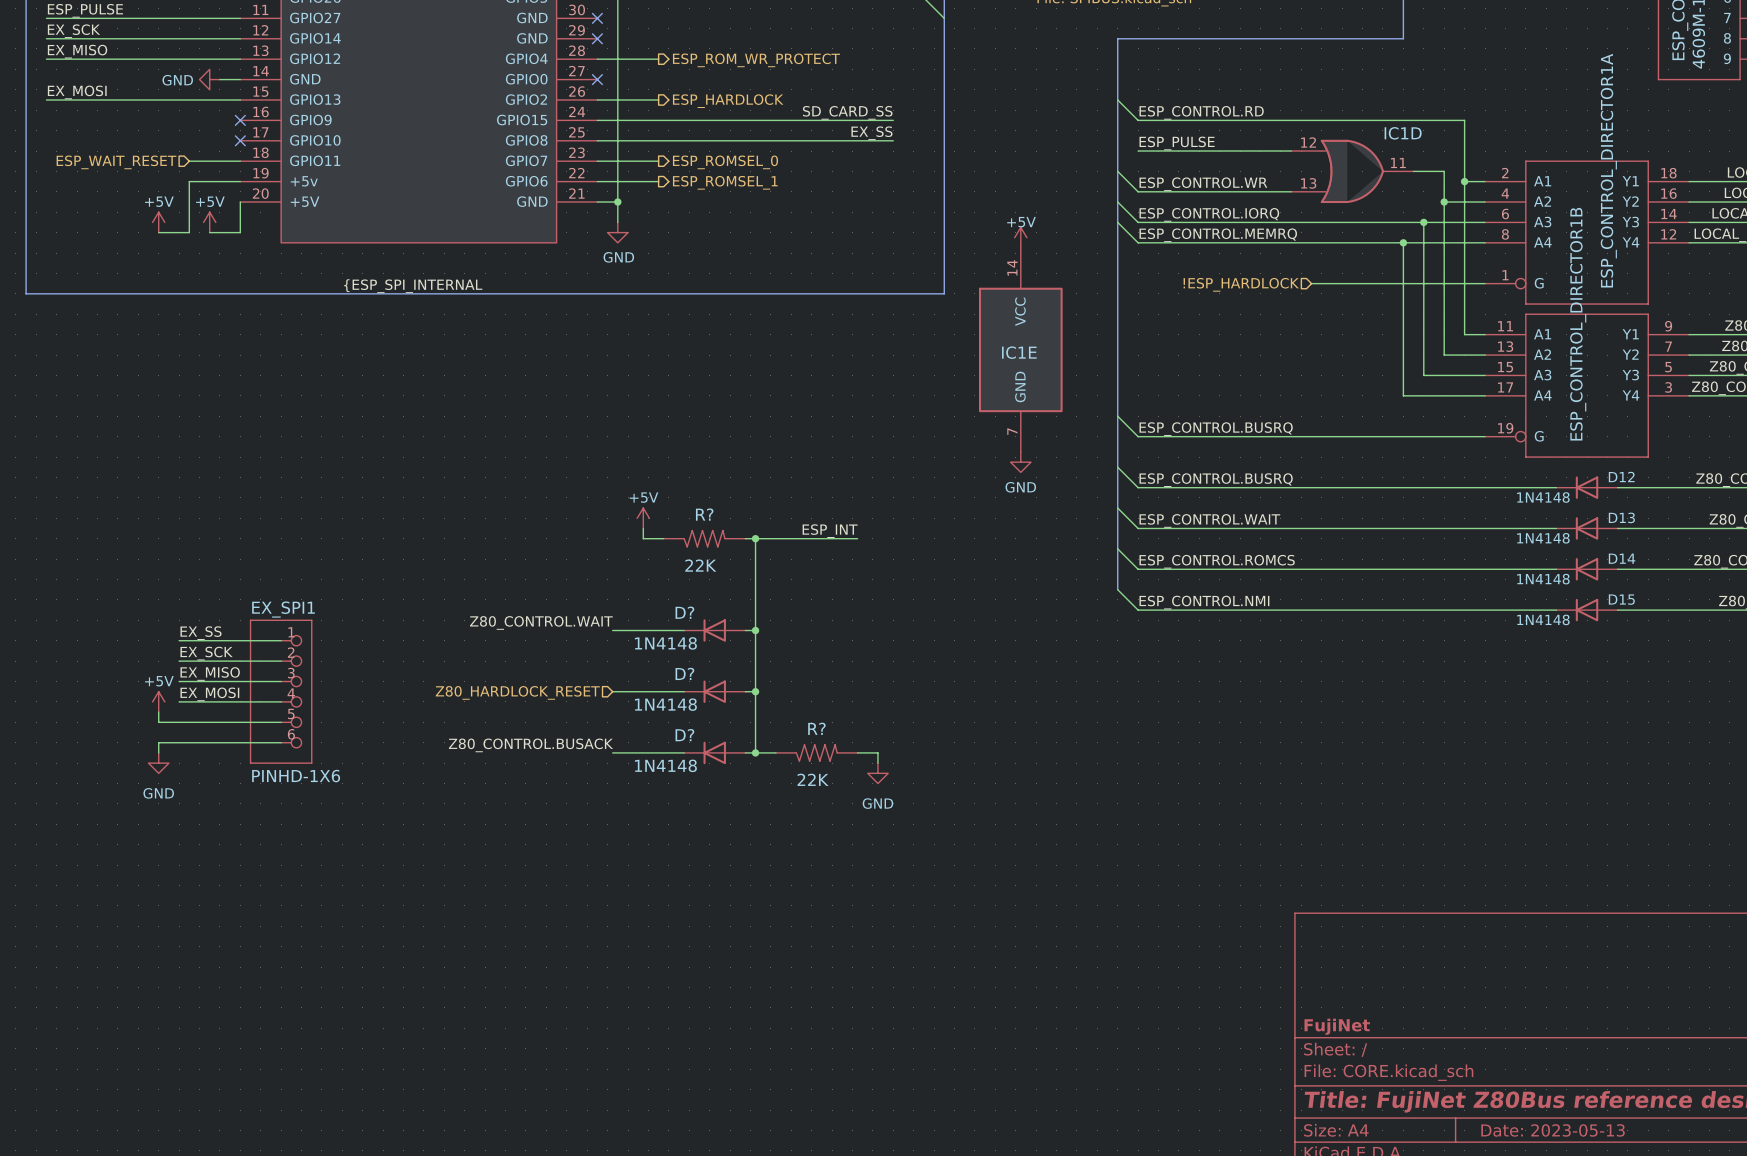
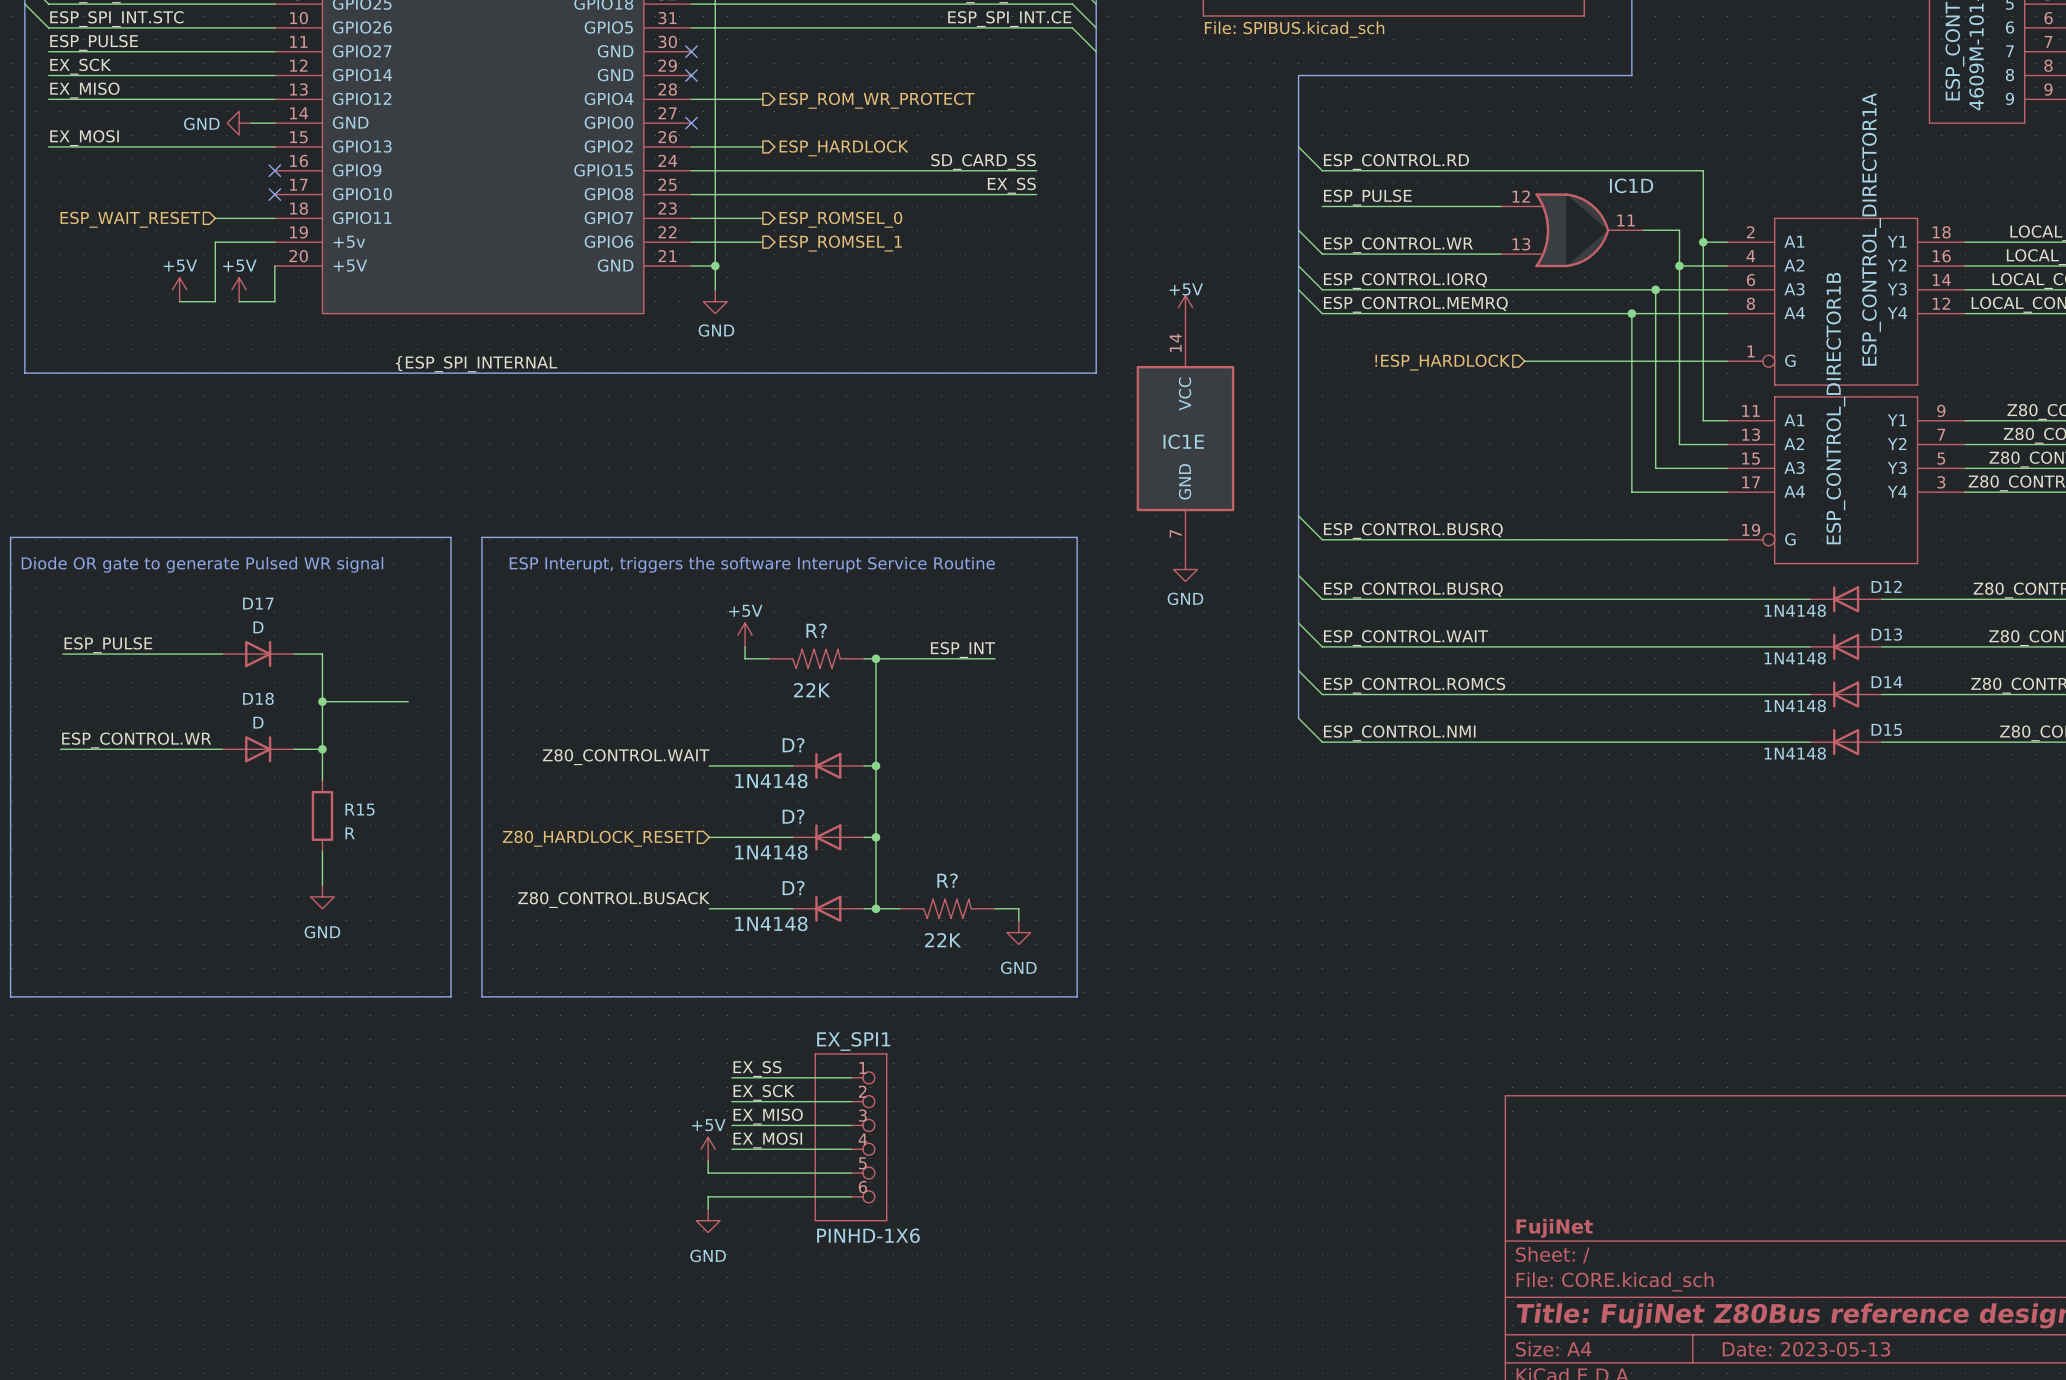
line: none -> (10, 537) (451, 537) (451, 996) (10, 996) (10, 537)
line: none -> (481, 537) (1077, 537) (1077, 996) (481, 996) (481, 537)
text: none -> Diode OR gate to generate Pulsed WR signal (202, 564)
text: none -> ESP Interupt, triggers the software Interupt Service Routine (752, 564)
label: none -> ESP_PULSE (108, 645)
wire: none -> (62, 654) (222, 654)
D17: none -> D (258, 654)
wire: none -> (293, 654) (322, 654) (322, 780)
wire: none -> (322, 701) (408, 701)
junction: none -> (322, 701)
label: none -> ESP_CONTROL.WR (136, 740)
wire: none -> (60, 749) (222, 749)
D18: none -> D (258, 749)
wire: none -> (293, 749) (322, 749)
junction: none -> (322, 749)
label: EX_SS (201, 633) -> none
wire: (179, 640) (281, 640) -> none
label: EX_SCK (206, 653) -> none
wire: (179, 661) (281, 661) -> none
label: EX_MISO (210, 673) -> none
R15: none -> R (322, 815)
wire: (179, 681) (281, 681) -> none
EX_SPI1 position: (281, 691) -> (850, 1137)
label: EX_MOSI (209, 694) -> none
power symbol: +5V (158, 701) -> none
wire: (179, 701) (281, 701) -> none
wire: none -> (322, 851) (322, 884)
wire: (158, 712) (158, 722) (281, 722) -> none
wire: (281, 742) (158, 742) (158, 752) -> none
power symbol position: GND (158, 763) -> GND (322, 896)
label: none -> EX_SS (757, 1069)
wire: none -> (731, 1077) (850, 1077)
label: none -> EX_SCK (763, 1092)
wire: none -> (731, 1101) (850, 1101)
label: none -> EX_MISO (768, 1116)
wire: none -> (731, 1125) (850, 1125)
label: none -> EX_MOSI (767, 1140)
power symbol: none -> +5V (708, 1149)
wire: none -> (731, 1149) (850, 1149)
wire: none -> (708, 1161) (708, 1173) (850, 1173)
wire: none -> (850, 1196) (708, 1196) (708, 1208)
power symbol: none -> GND (708, 1220)

